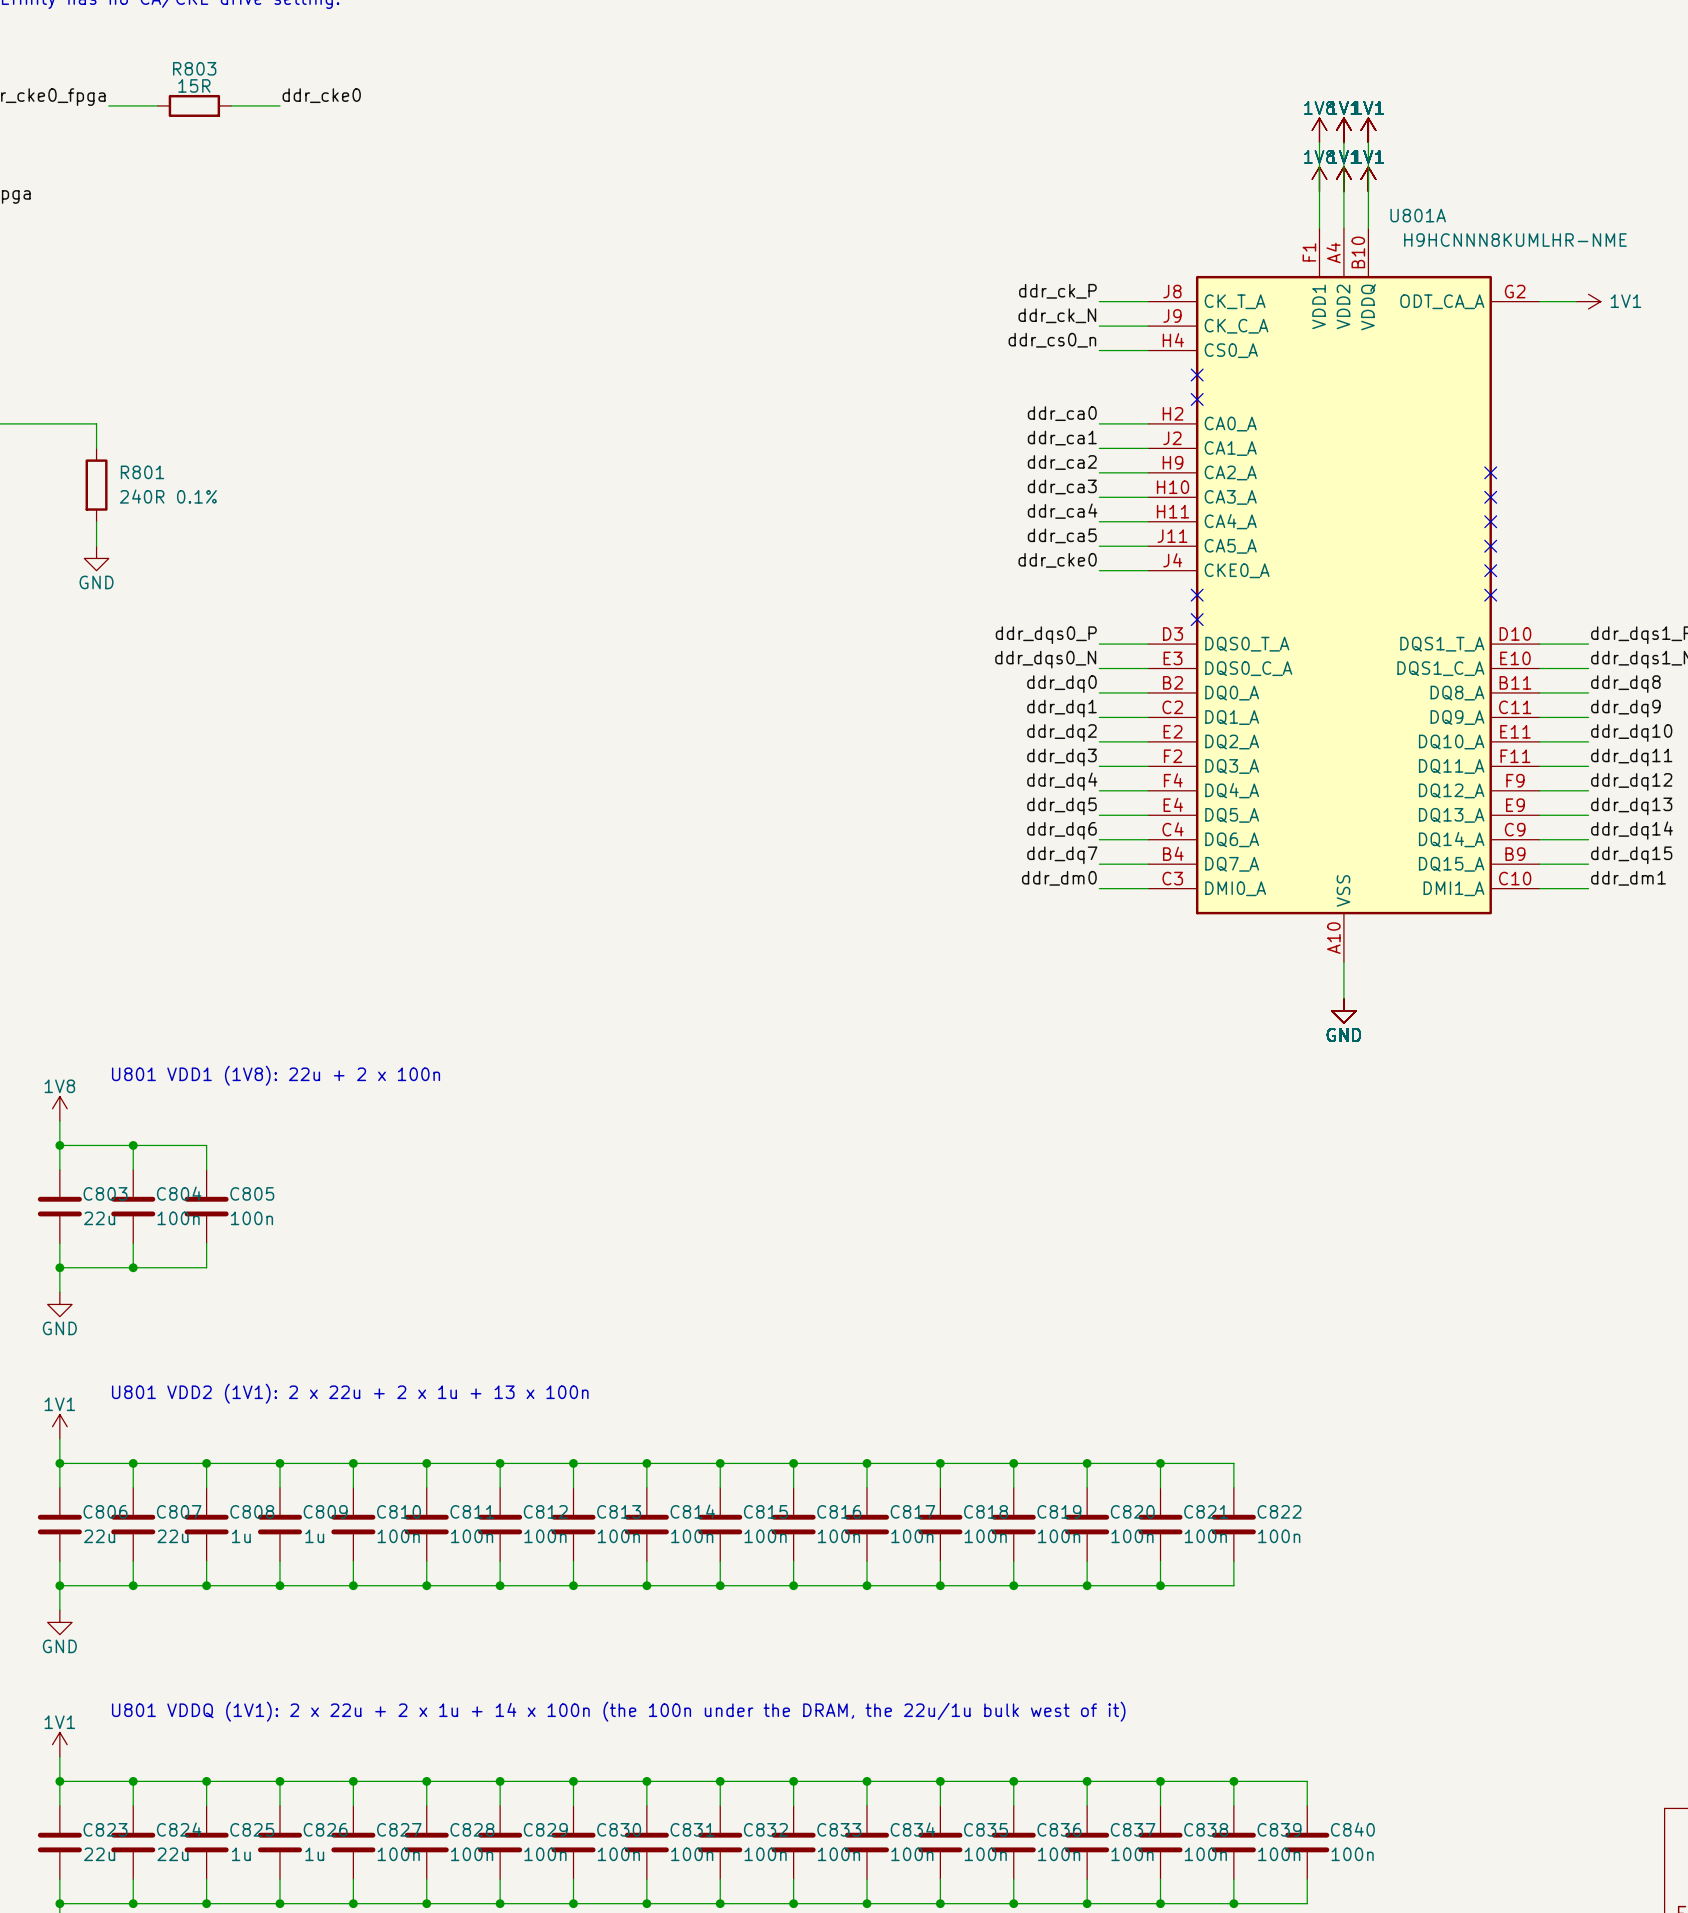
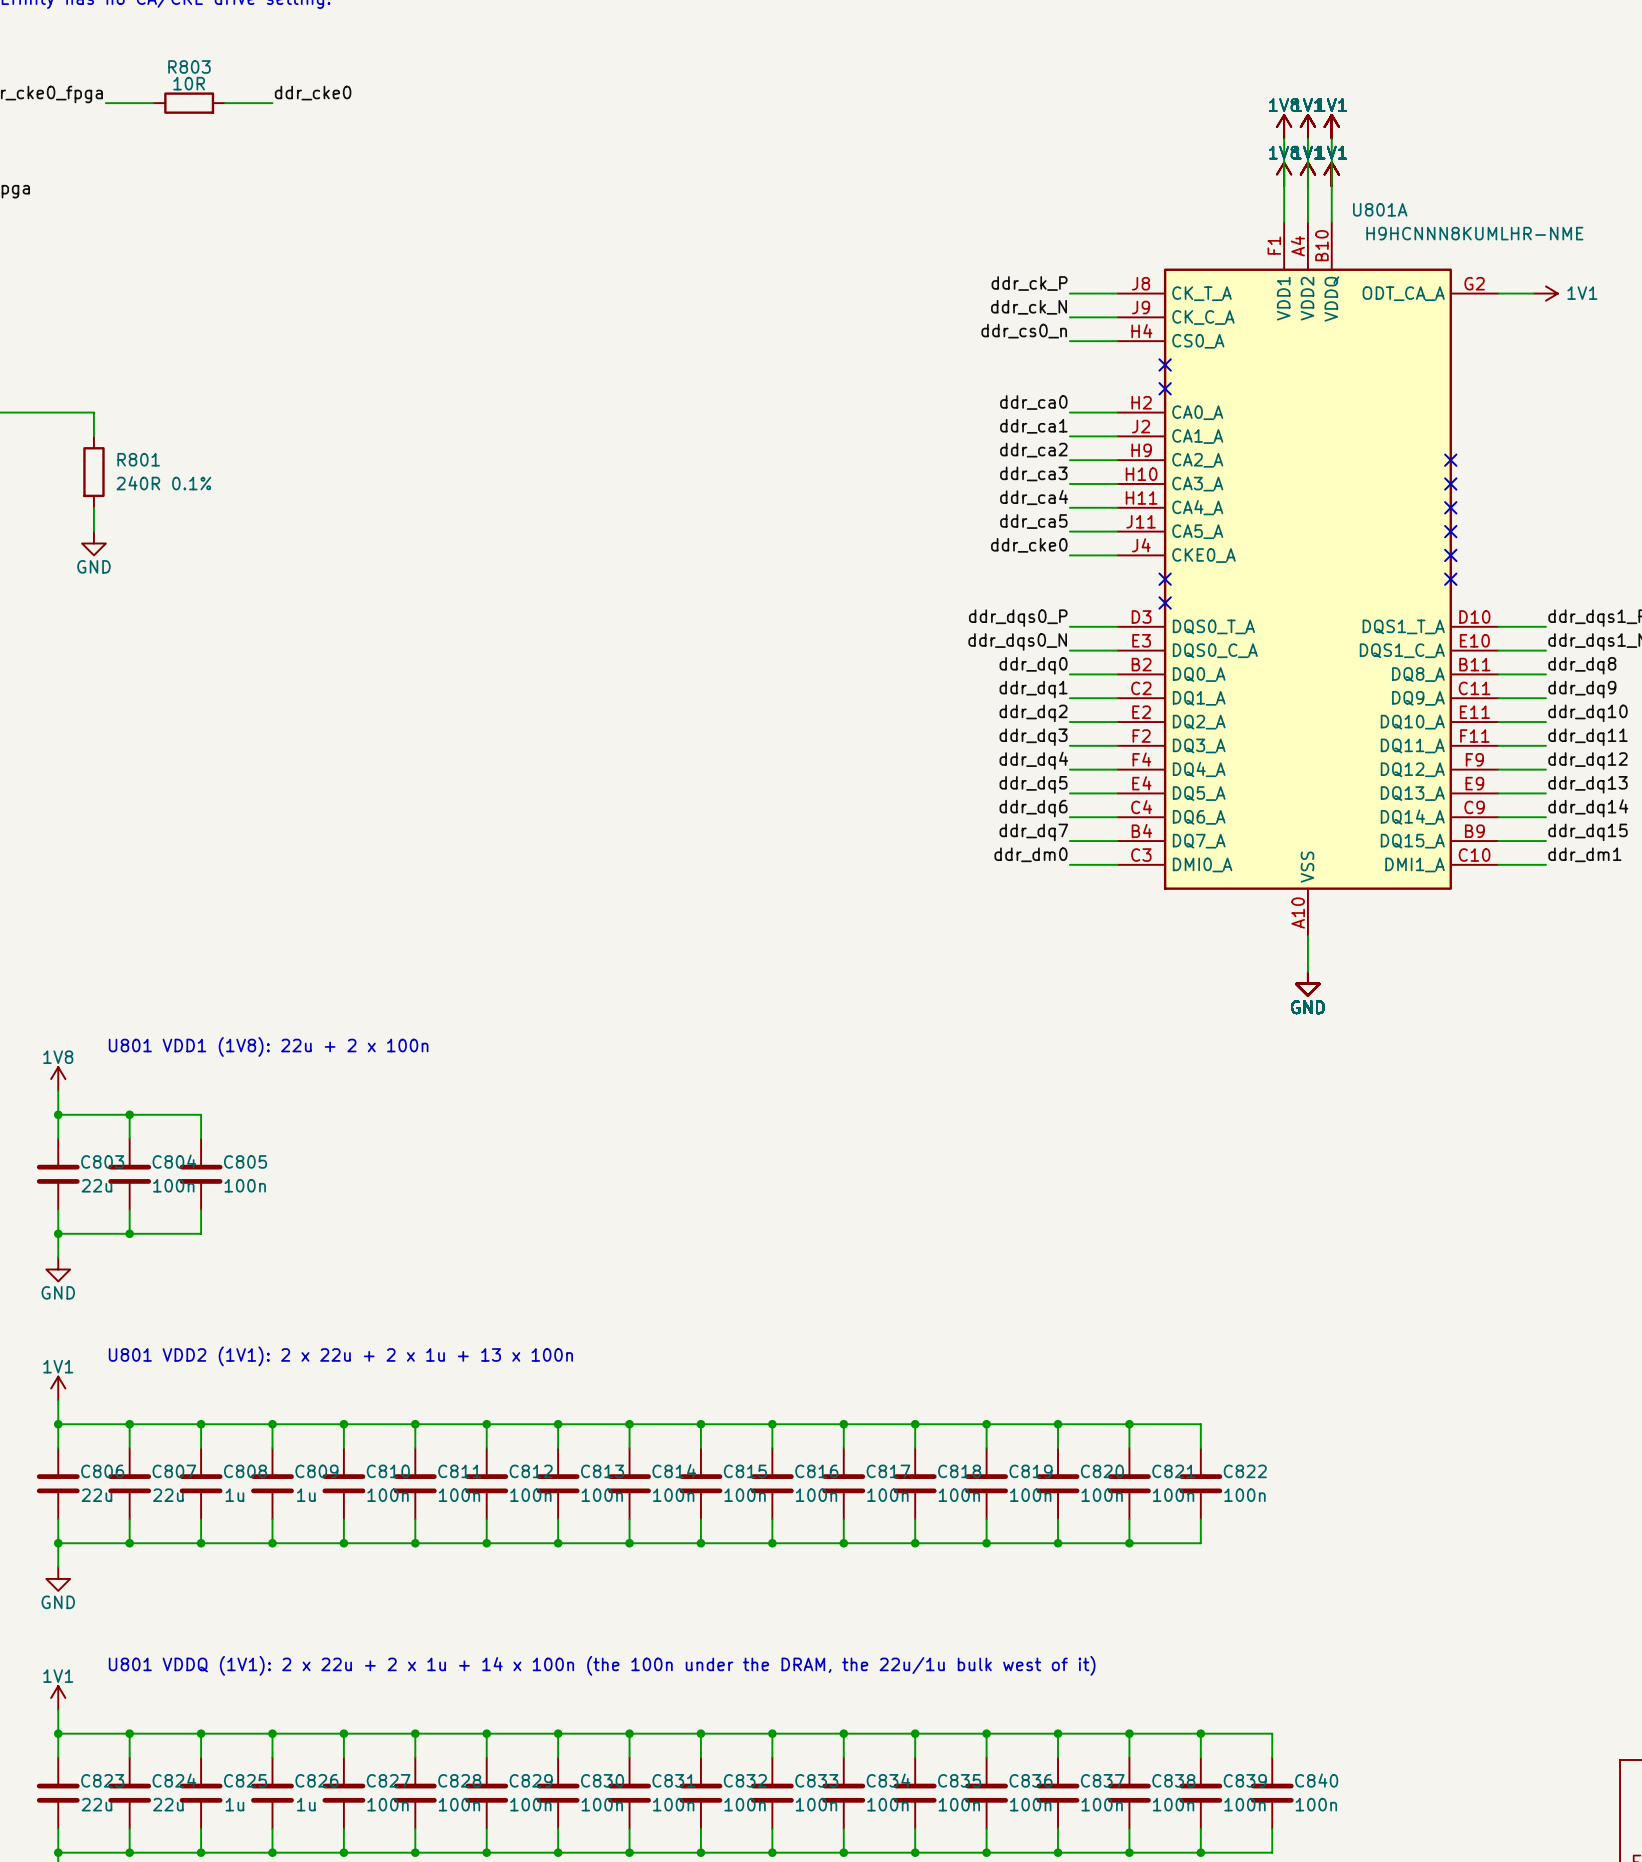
R803 value: 15R (194, 85) -> 10R (189, 83)

